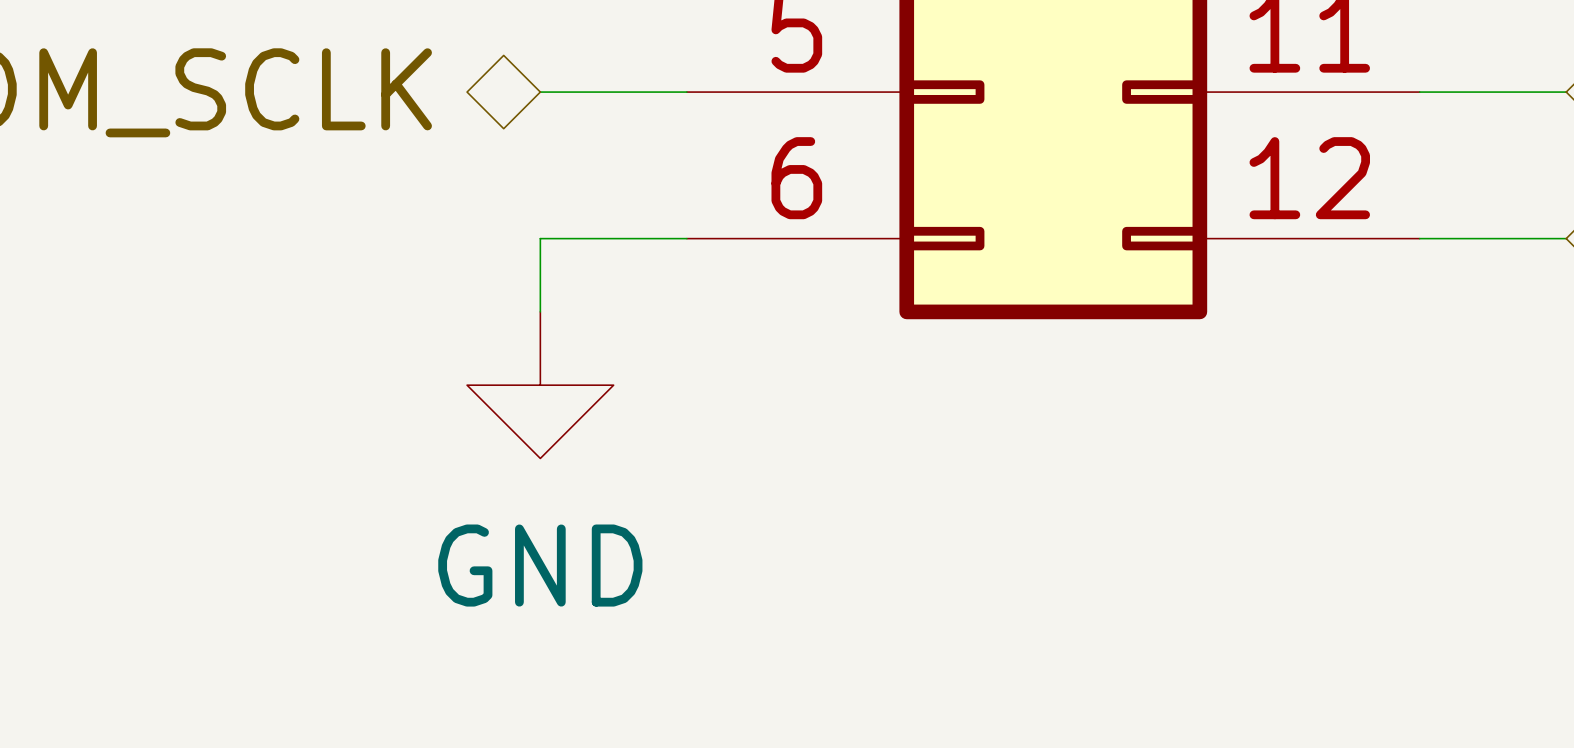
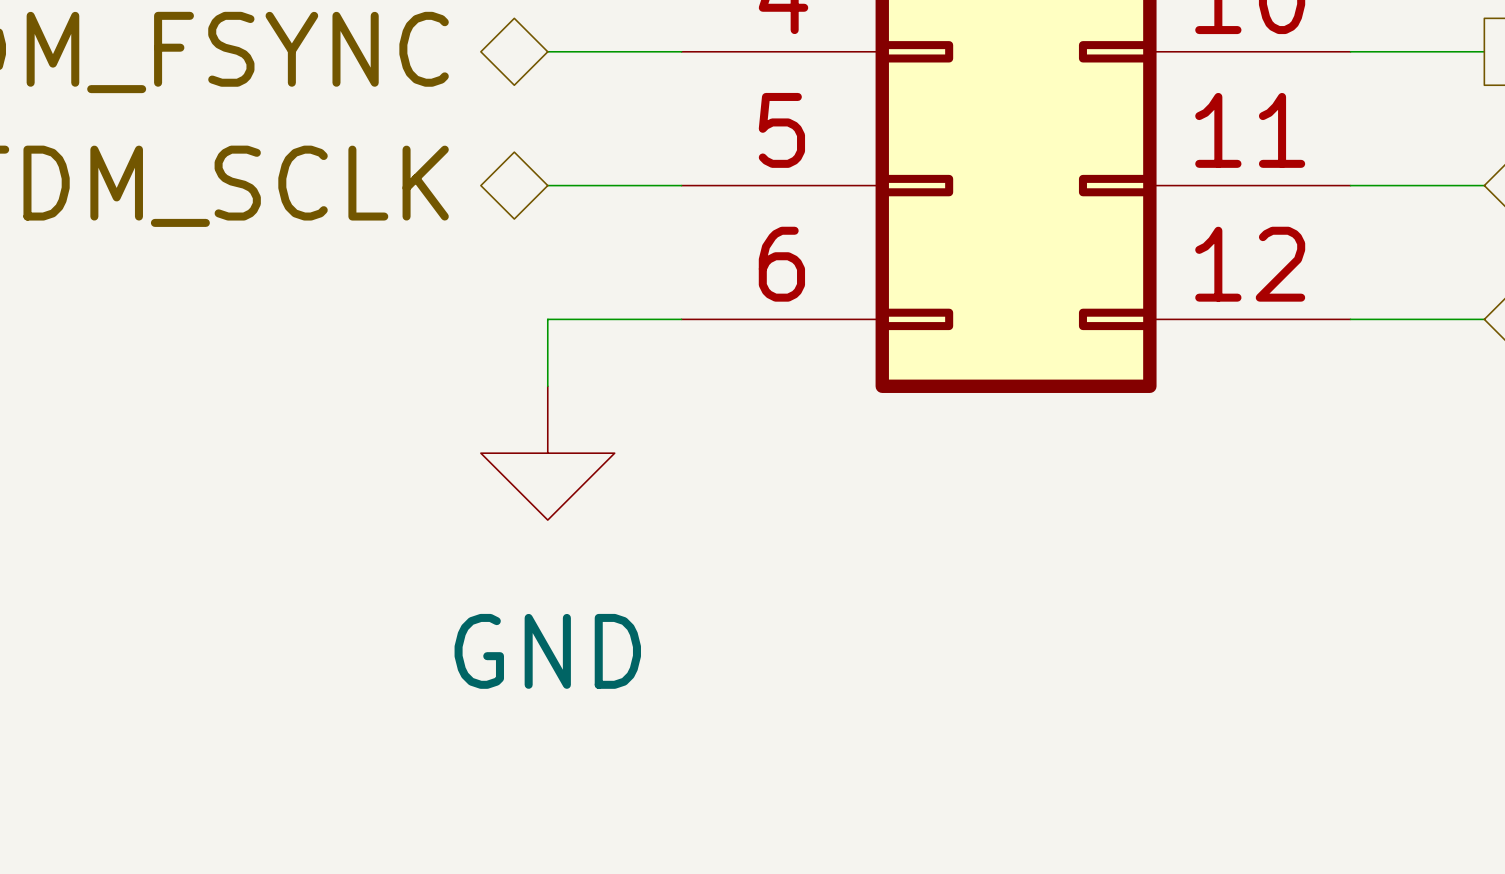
power symbol text position: GND (540, 565) -> GND (547, 651)

